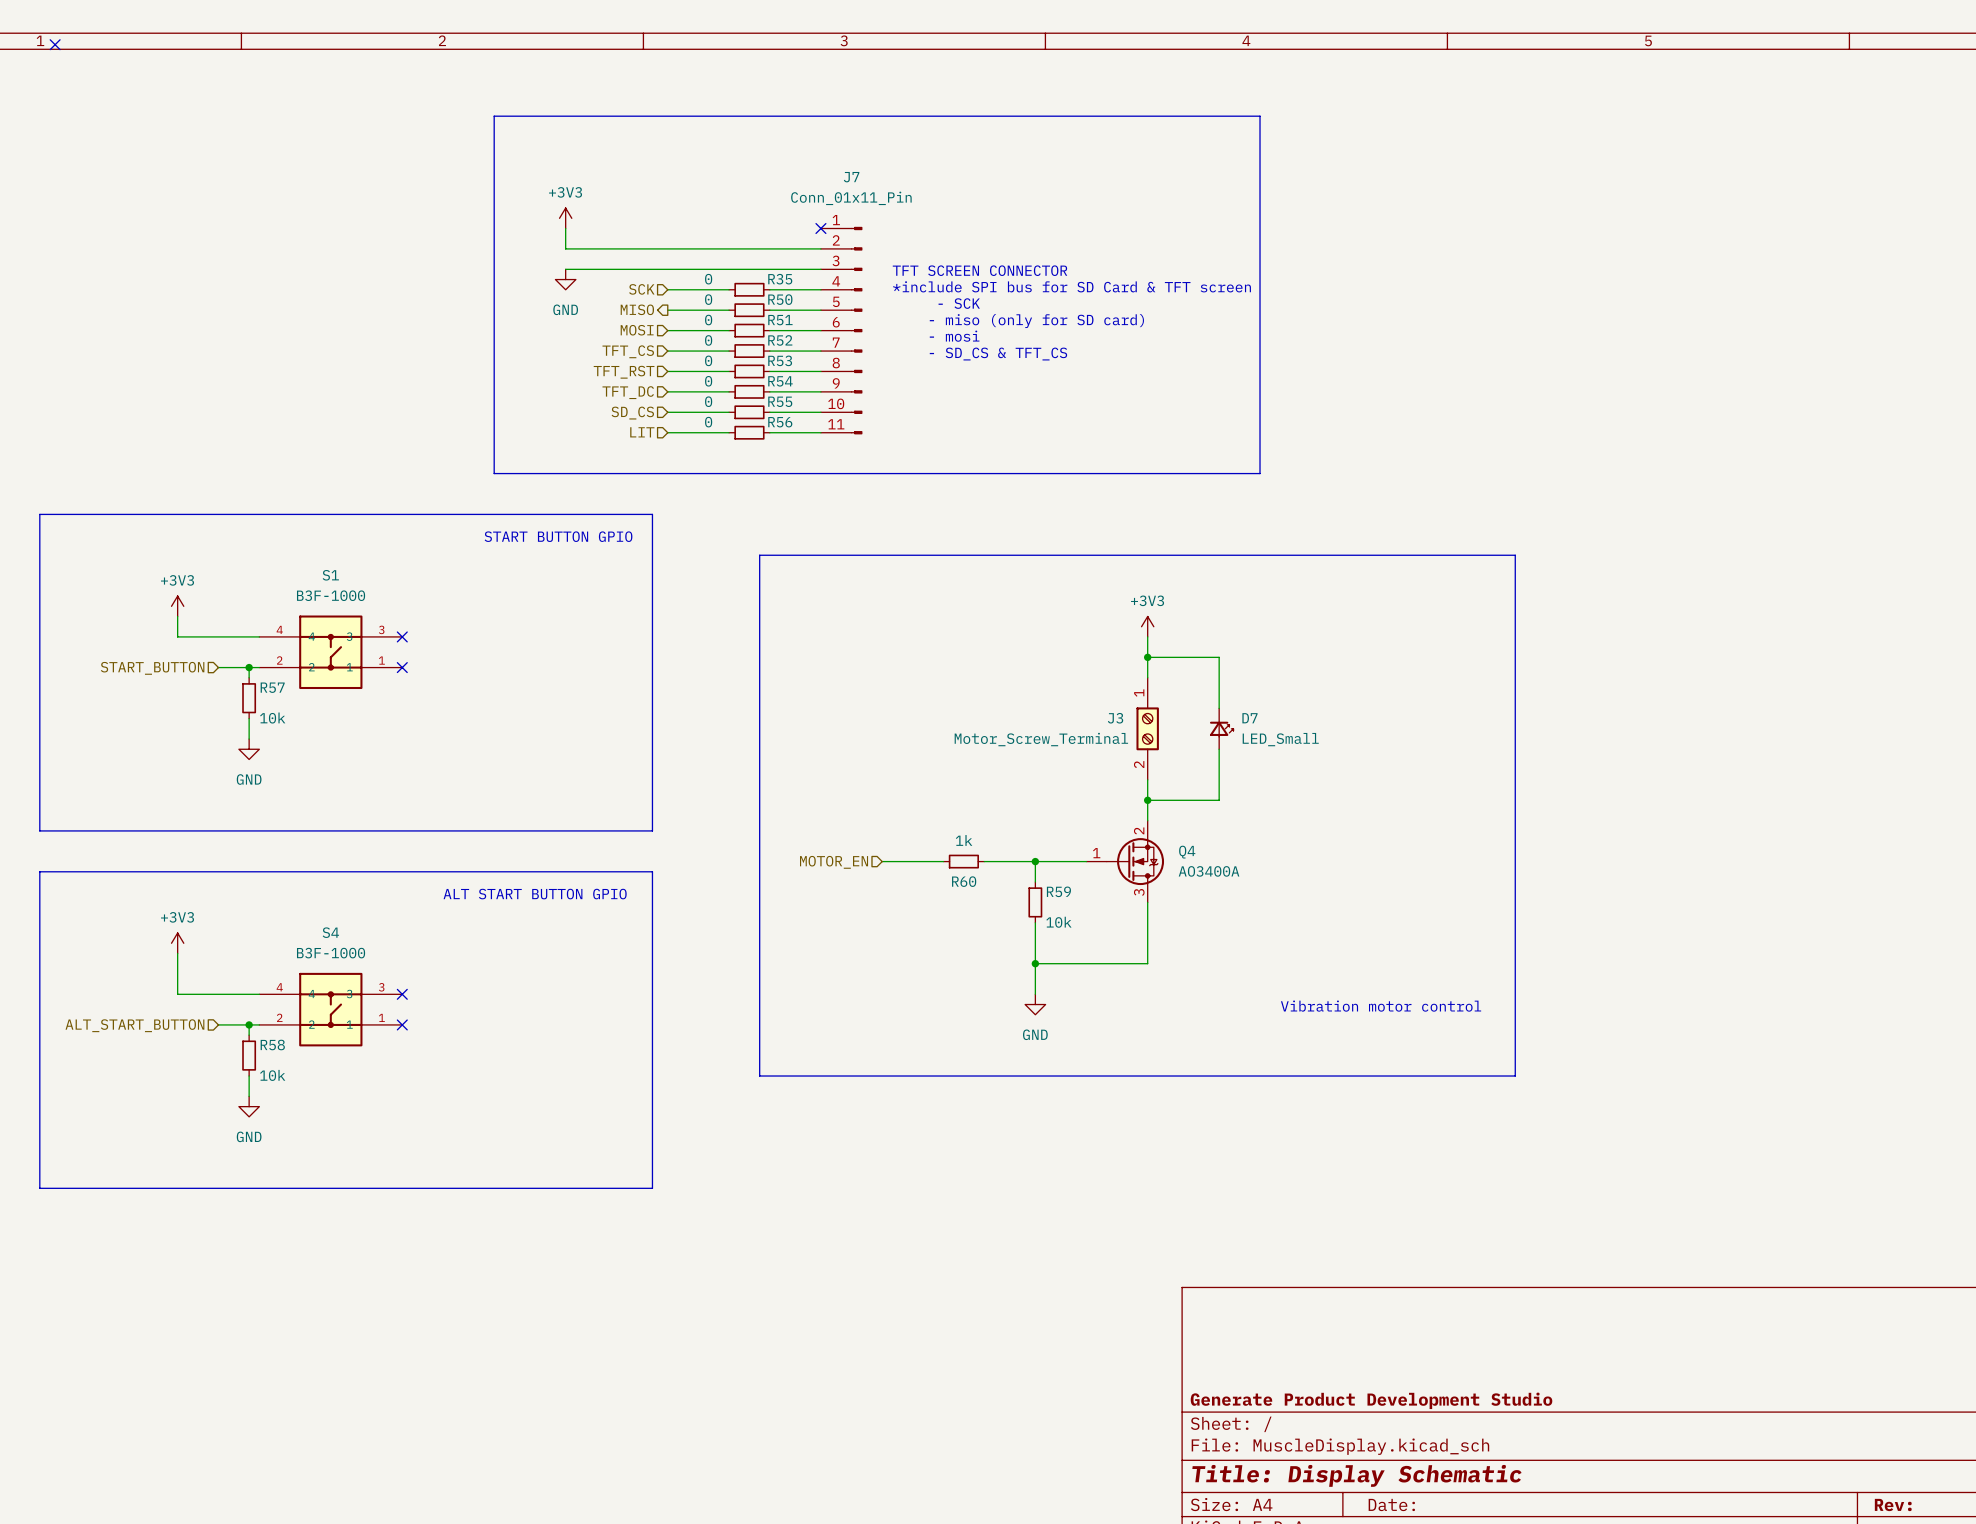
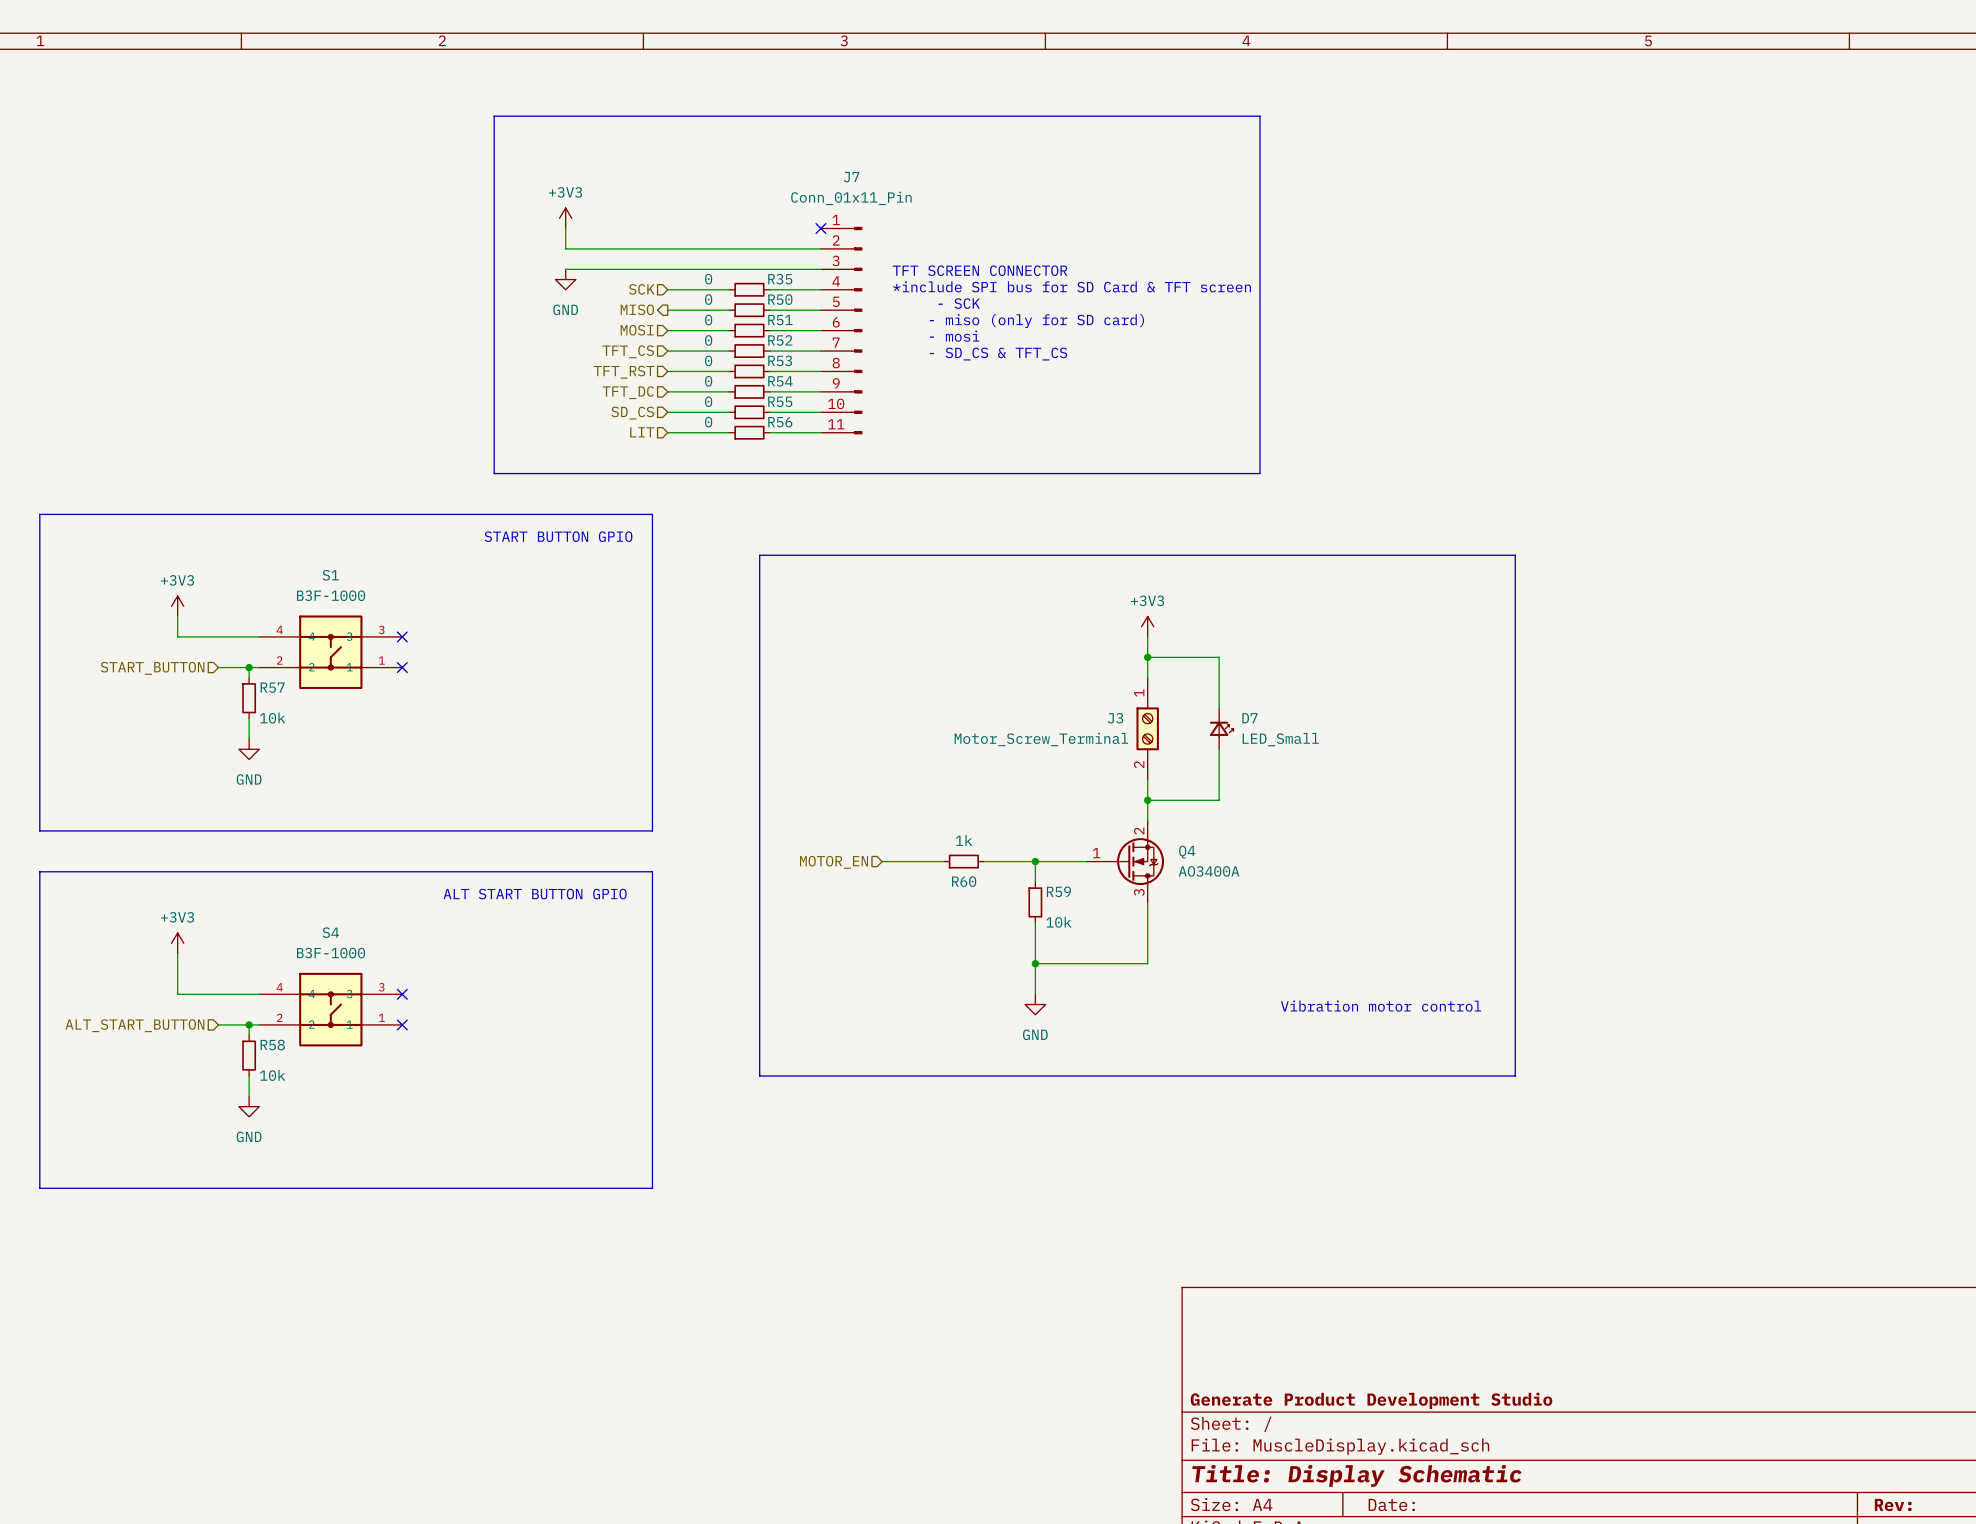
no-connect mark: (55, 44) -> none

